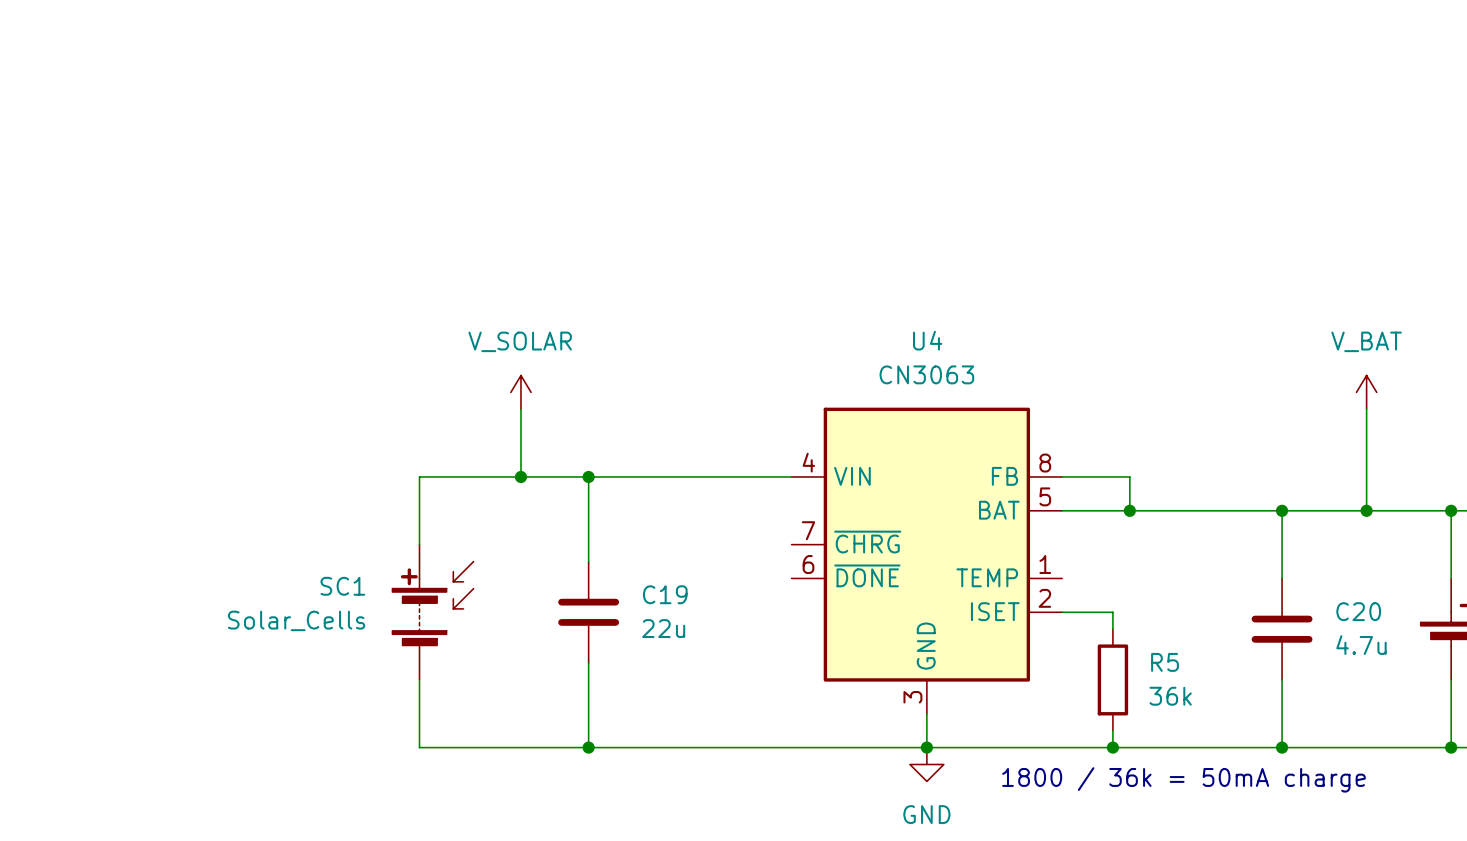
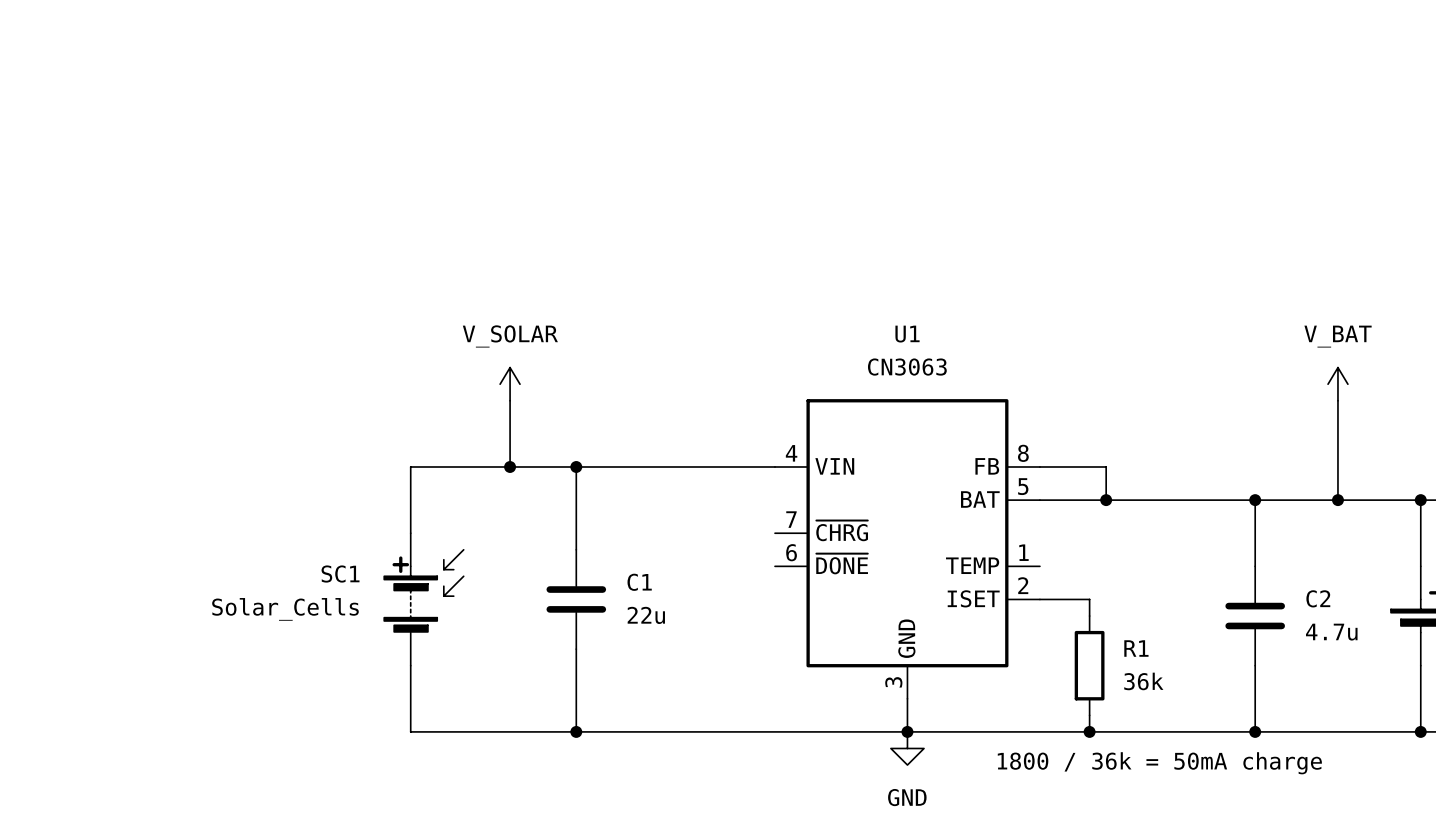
U4 name: U4 (927, 340) -> U1 (907, 334)
C19 name: C19 (665, 594) -> C1 (639, 582)
C20 name: C20 (1358, 611) -> C2 (1318, 598)
R5 name: R5 (1164, 662) -> R1 (1136, 648)

